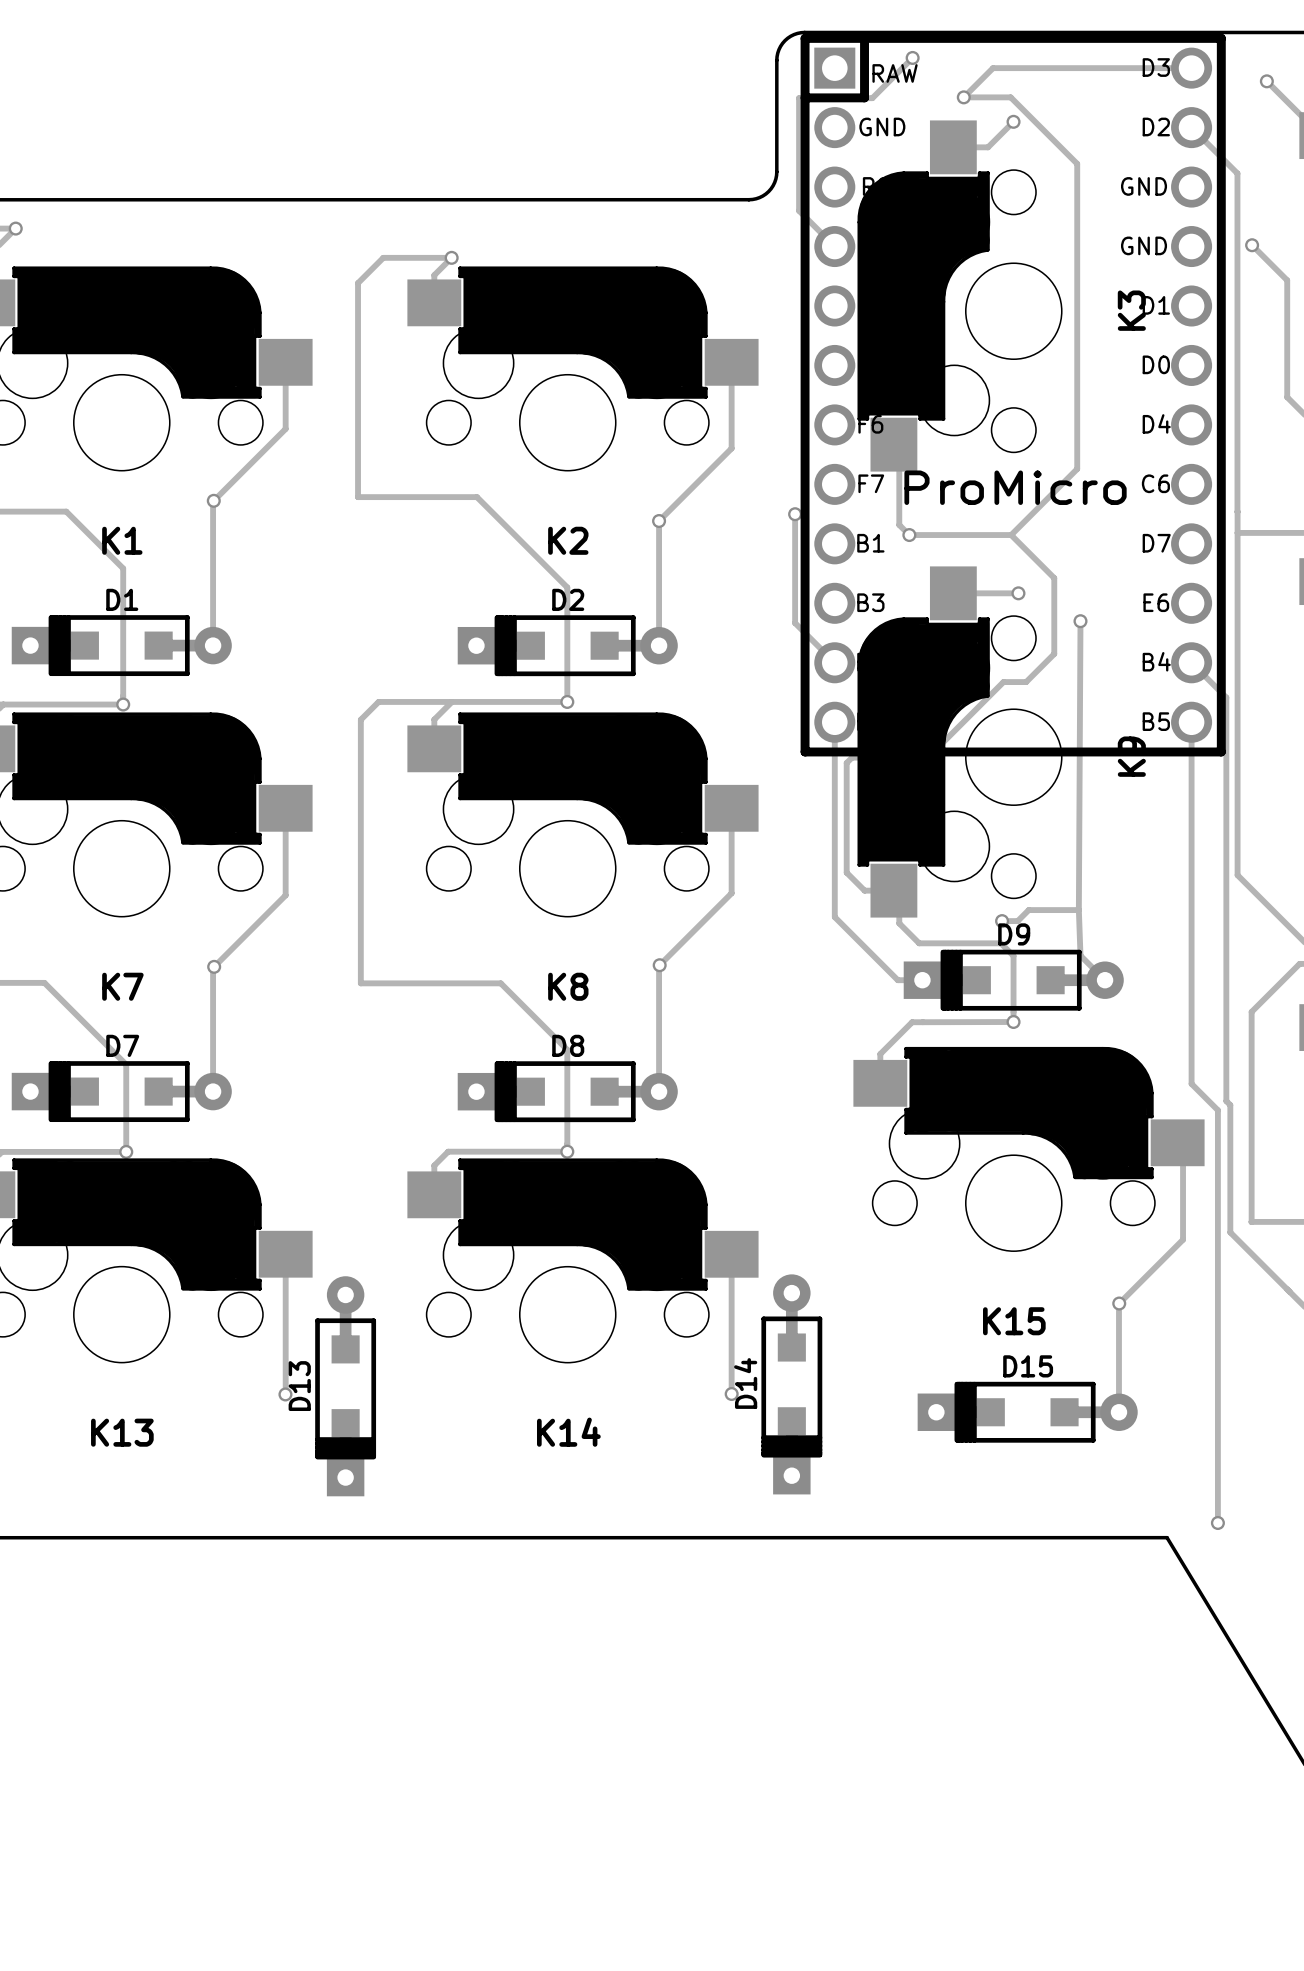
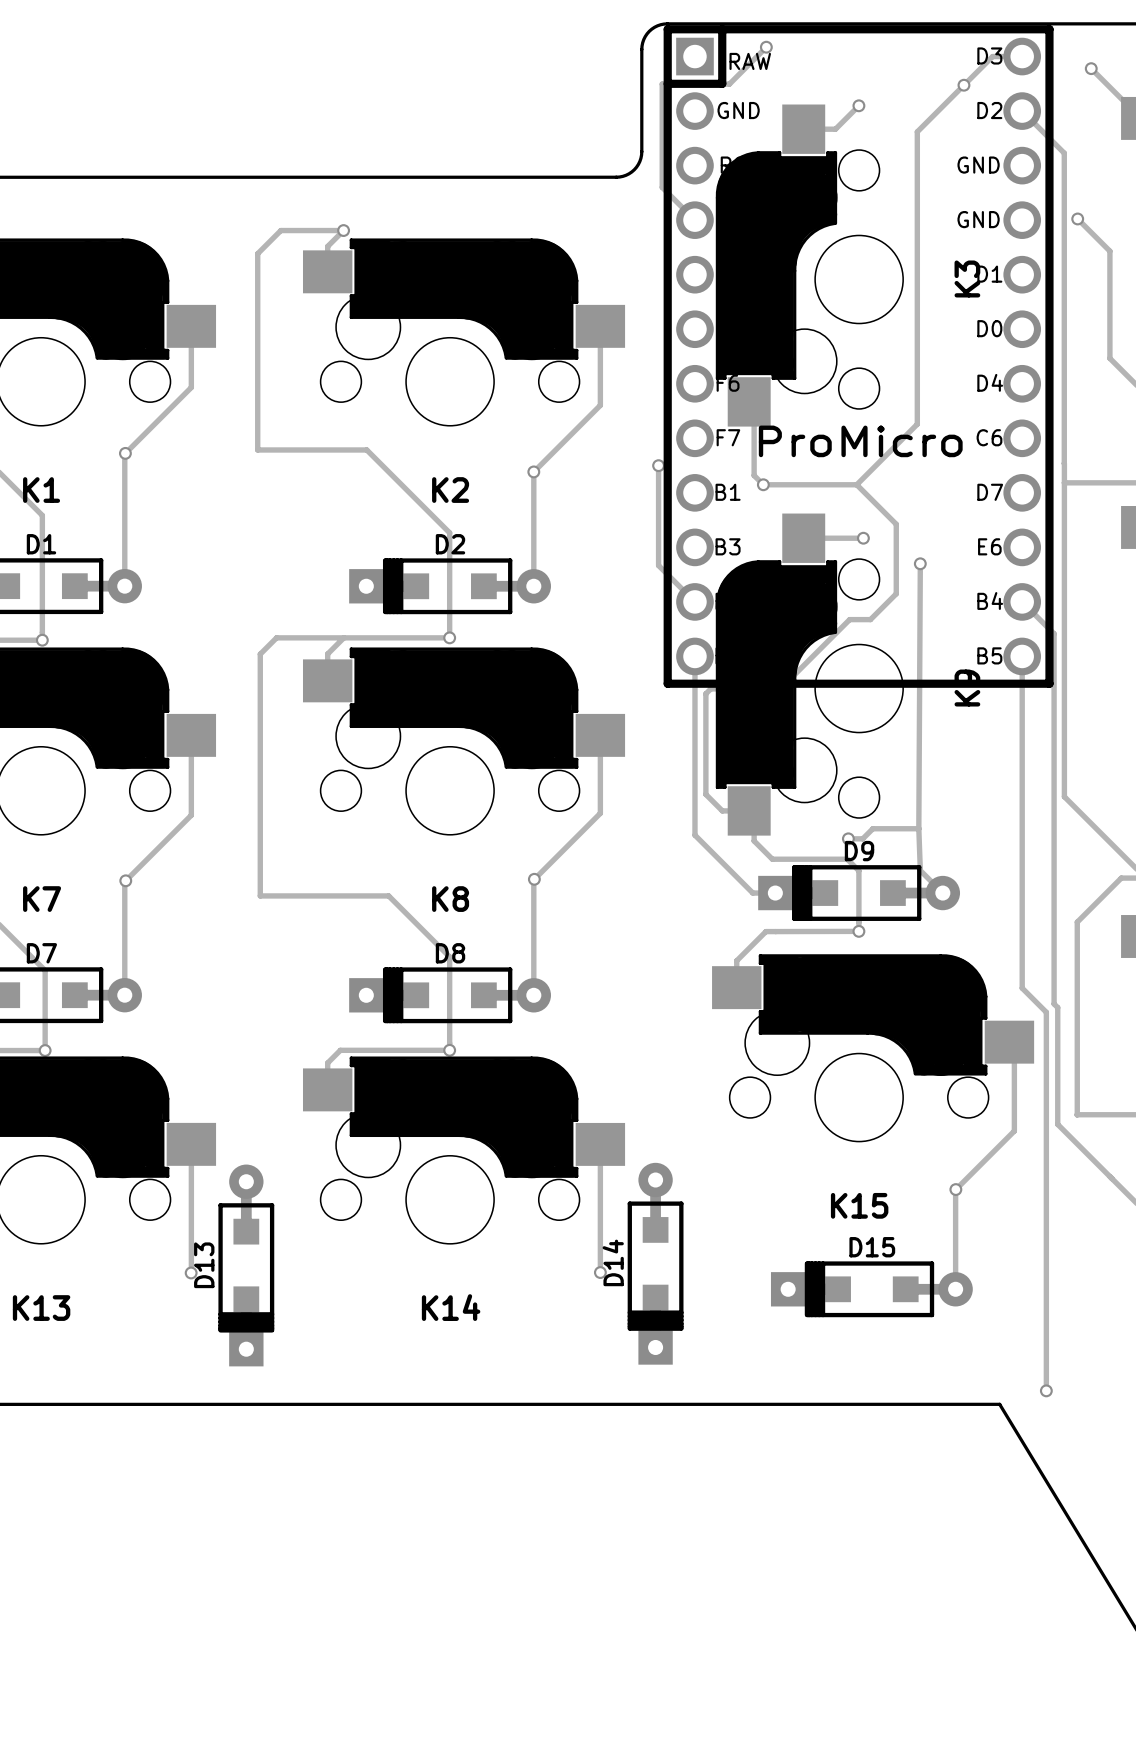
track: (1159, 68) (993, 68) (962, 98) -> (992, 56) (917, 131) (917, 144)
track: (963, 97) (1010, 97) (1077, 163) -> none
via: (963, 97) -> none
via: none -> (963, 85)

